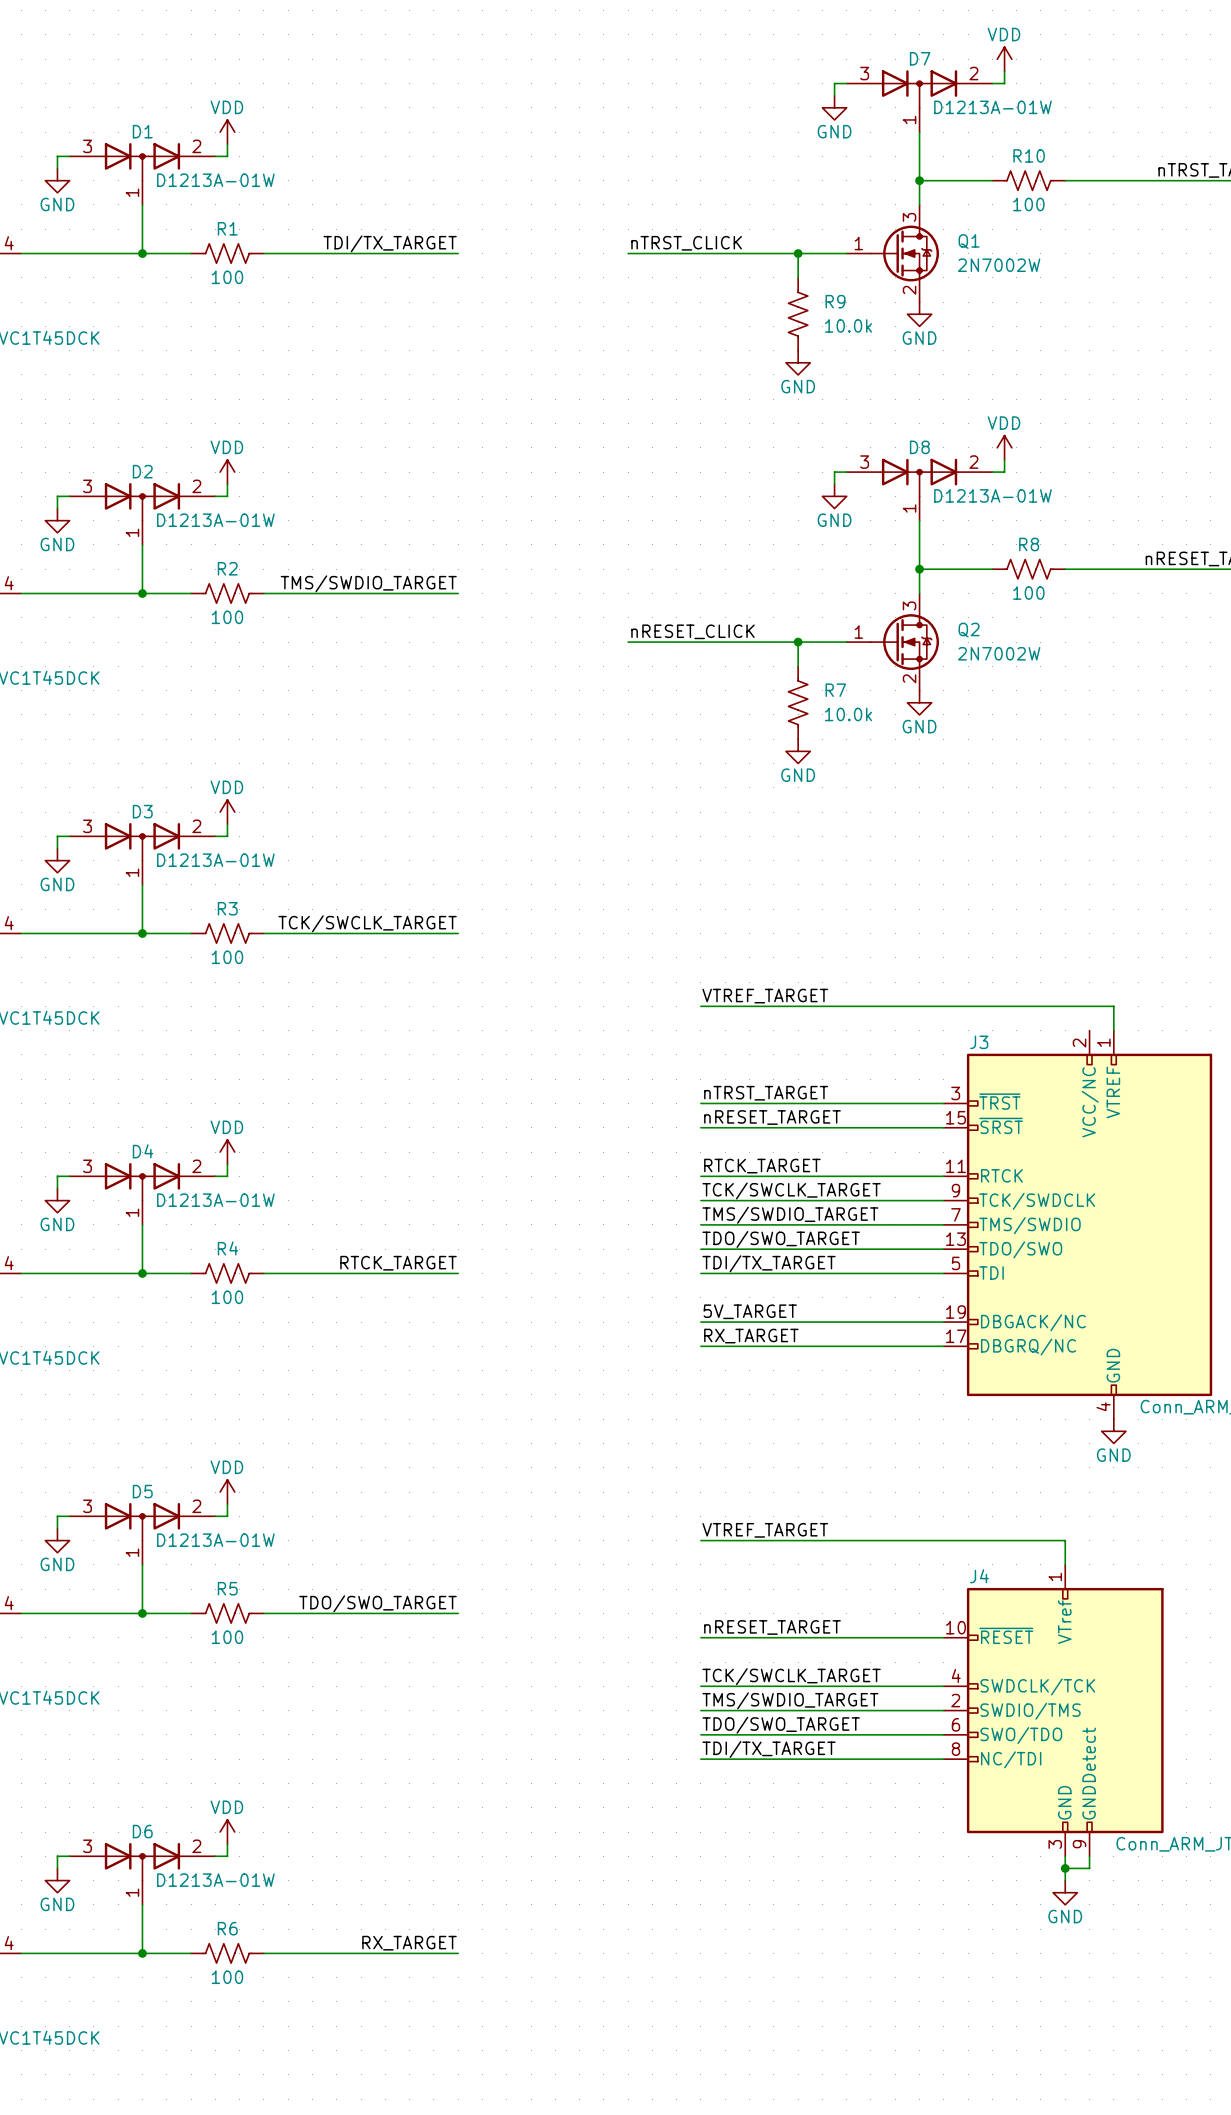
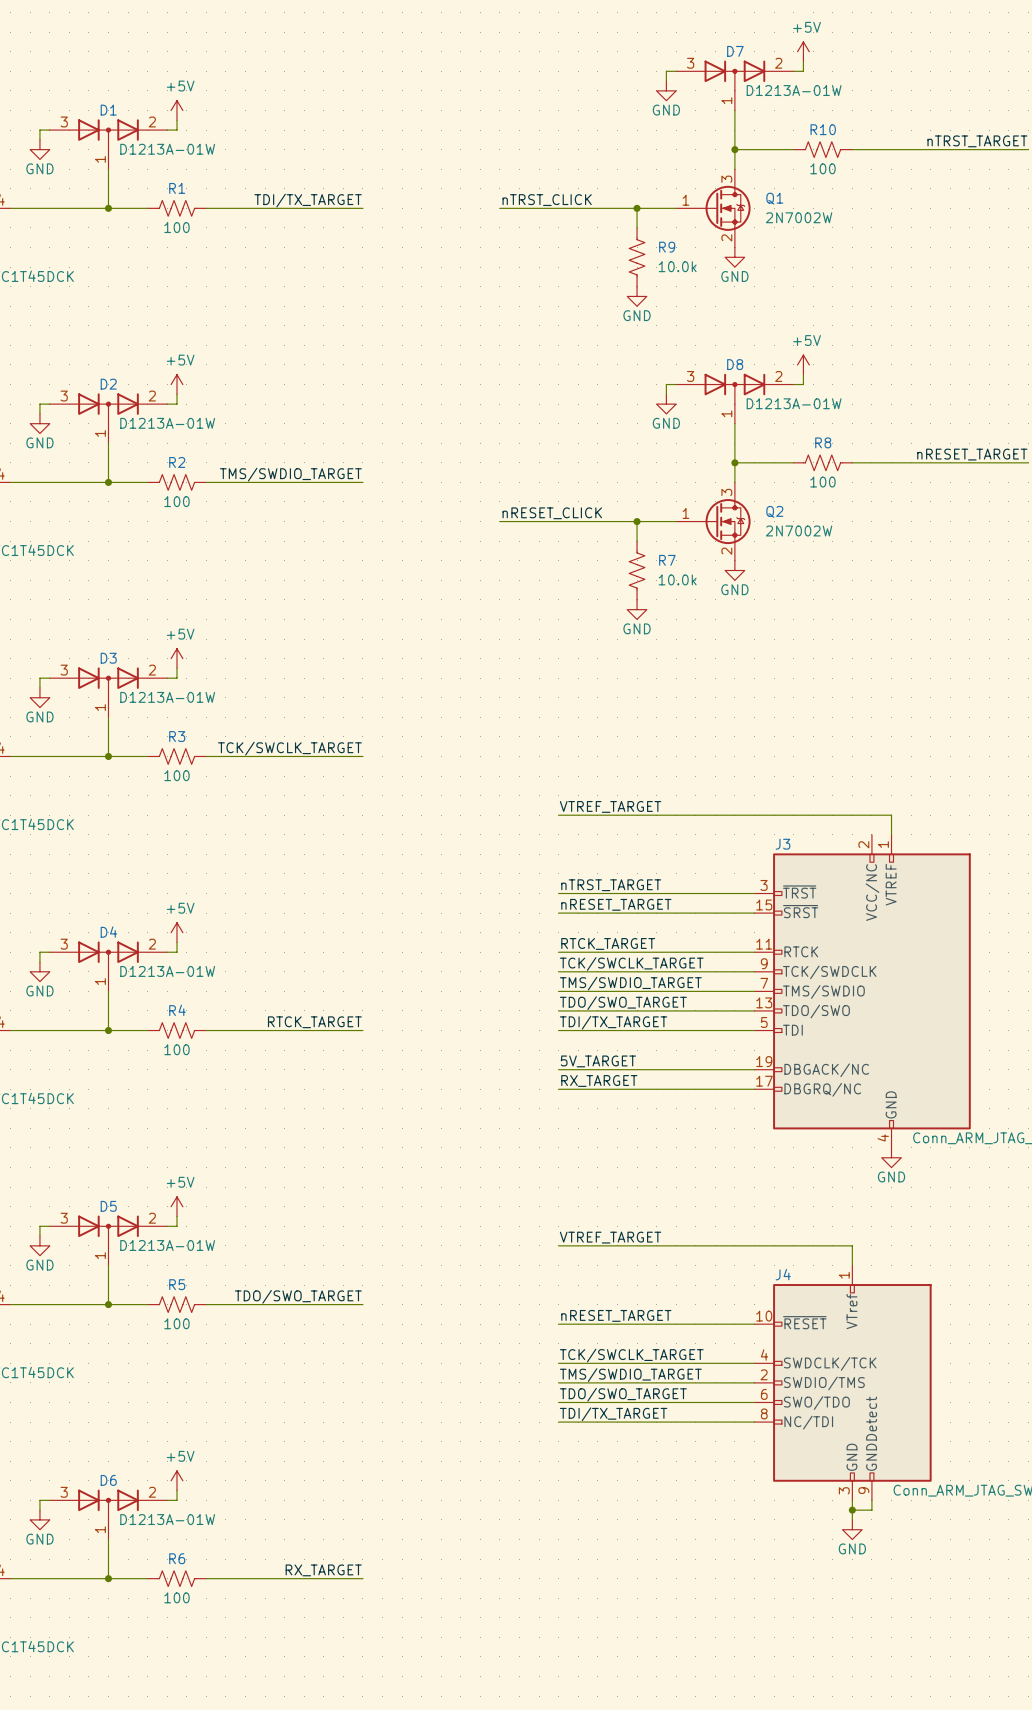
power symbol: VDD (1004, 59) -> +5V (803, 51)
power symbol: VDD (227, 132) -> +5V (176, 110)
power symbol: VDD (1004, 447) -> +5V (803, 364)
power symbol: VDD (227, 472) -> +5V (176, 384)
power symbol: VDD (227, 812) -> +5V (176, 658)
power symbol: VDD (227, 1152) -> +5V (176, 932)
power symbol: VDD (227, 1492) -> +5V (176, 1206)
power symbol: VDD (227, 1832) -> +5V (176, 1480)

